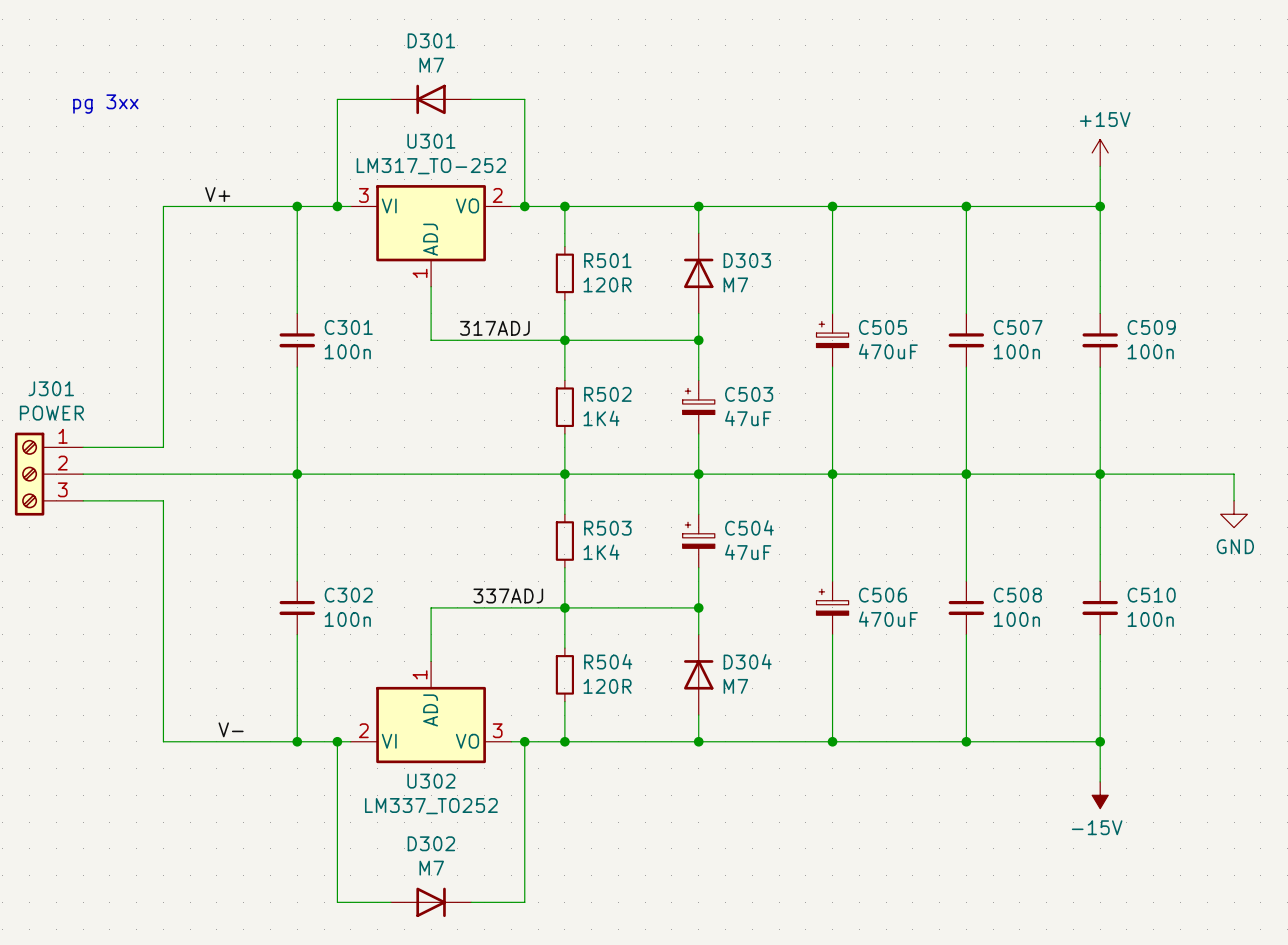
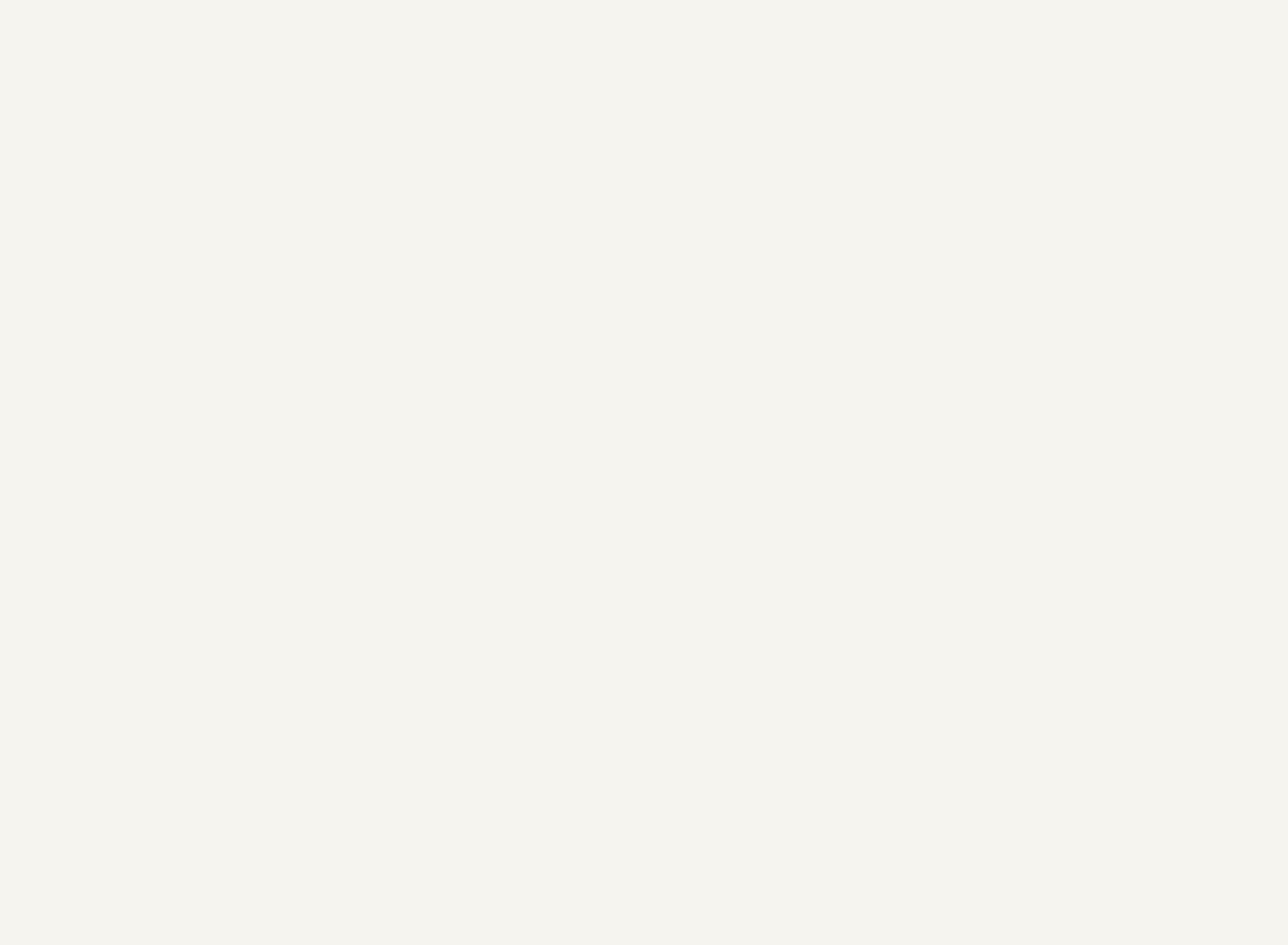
wire: (390, 99) (337, 99) (337, 206) -> none
D301: M7 (431, 99) -> none
wire: (471, 99) (524, 99) (524, 206) -> none
text: pg 3xx (105, 104) -> none
power symbol: +15V (1100, 152) -> none
wire: (1100, 166) (1100, 313) -> none
label: V+ (217, 194) -> none
wire: (297, 206) (297, 313) -> none
junction: (297, 206) -> none
junction: (337, 206) -> none
wire: (350, 206) (163, 206) (163, 447) (83, 447) -> none
wire: (511, 206) (1100, 206) -> none
junction: (524, 206) -> none
wire: (564, 206) (564, 246) -> none
junction: (564, 206) -> none
wire: (698, 206) (698, 233) -> none
junction: (698, 206) -> none
wire: (832, 206) (832, 313) -> none
junction: (832, 206) -> none
wire: (966, 206) (966, 313) -> none
junction: (966, 206) -> none
junction: (1100, 206) -> none
U301: LM317_TO-252 (431, 235) -> none
R501: 120R (564, 273) -> none
D303: M7 (698, 273) -> none
wire: (431, 286) (431, 340) (698, 340) -> none
wire: (564, 300) (564, 380) -> none
wire: (698, 313) (698, 380) -> none
label: 317ADJ (494, 328) -> none
C301: 100n (297, 340) -> none
junction: (564, 340) -> none
junction: (698, 340) -> none
C505: 470uF (832, 340) -> none
C507: 100n (966, 340) -> none
C509: 100n (1100, 340) -> none
wire: (297, 367) (297, 581) -> none
wire: (832, 367) (832, 581) -> none
wire: (966, 367) (966, 581) -> none
wire: (1100, 367) (1100, 581) -> none
R502: 1K4 (564, 407) -> none
C503: 47uF (698, 407) -> none
wire: (564, 433) (564, 514) -> none
wire: (698, 433) (698, 514) -> none
J301: POWER (49, 474) -> none
wire: (83, 474) (1234, 474) (1234, 500) -> none
junction: (297, 474) -> none
junction: (564, 474) -> none
junction: (698, 474) -> none
junction: (832, 474) -> none
junction: (966, 474) -> none
junction: (1100, 474) -> none
wire: (83, 500) (163, 500) (163, 741) (350, 741) -> none
power symbol: GND (1234, 514) -> none
R503: 1K4 (564, 541) -> none
C504: 47uF (698, 541) -> none
wire: (564, 567) (564, 648) -> none
wire: (698, 567) (698, 634) -> none
label: 337ADJ (508, 596) -> none
C302: 100n (297, 607) -> none
junction: (564, 607) -> none
wire: (698, 607) (431, 607) (431, 661) -> none
junction: (698, 607) -> none
C506: 470uF (832, 607) -> none
C508: 100n (966, 607) -> none
C510: 100n (1100, 607) -> none
wire: (297, 634) (297, 741) -> none
wire: (832, 634) (832, 741) -> none
wire: (966, 634) (966, 741) -> none
wire: (1100, 634) (1100, 781) -> none
R504: 120R (564, 674) -> none
D304: M7 (698, 674) -> none
wire: (564, 701) (564, 741) -> none
U302: LM337_TO252 (431, 712) -> none
wire: (698, 715) (698, 741) -> none
label: V- (231, 729) -> none
junction: (297, 741) -> none
wire: (337, 741) (337, 902) (390, 902) -> none
junction: (337, 741) -> none
wire: (511, 741) (1100, 741) -> none
wire: (524, 741) (524, 902) (471, 902) -> none
junction: (524, 741) -> none
junction: (564, 741) -> none
junction: (698, 741) -> none
junction: (832, 741) -> none
junction: (966, 741) -> none
junction: (1100, 741) -> none
power symbol: -15V (1100, 795) -> none
D302: M7 (431, 902) -> none

